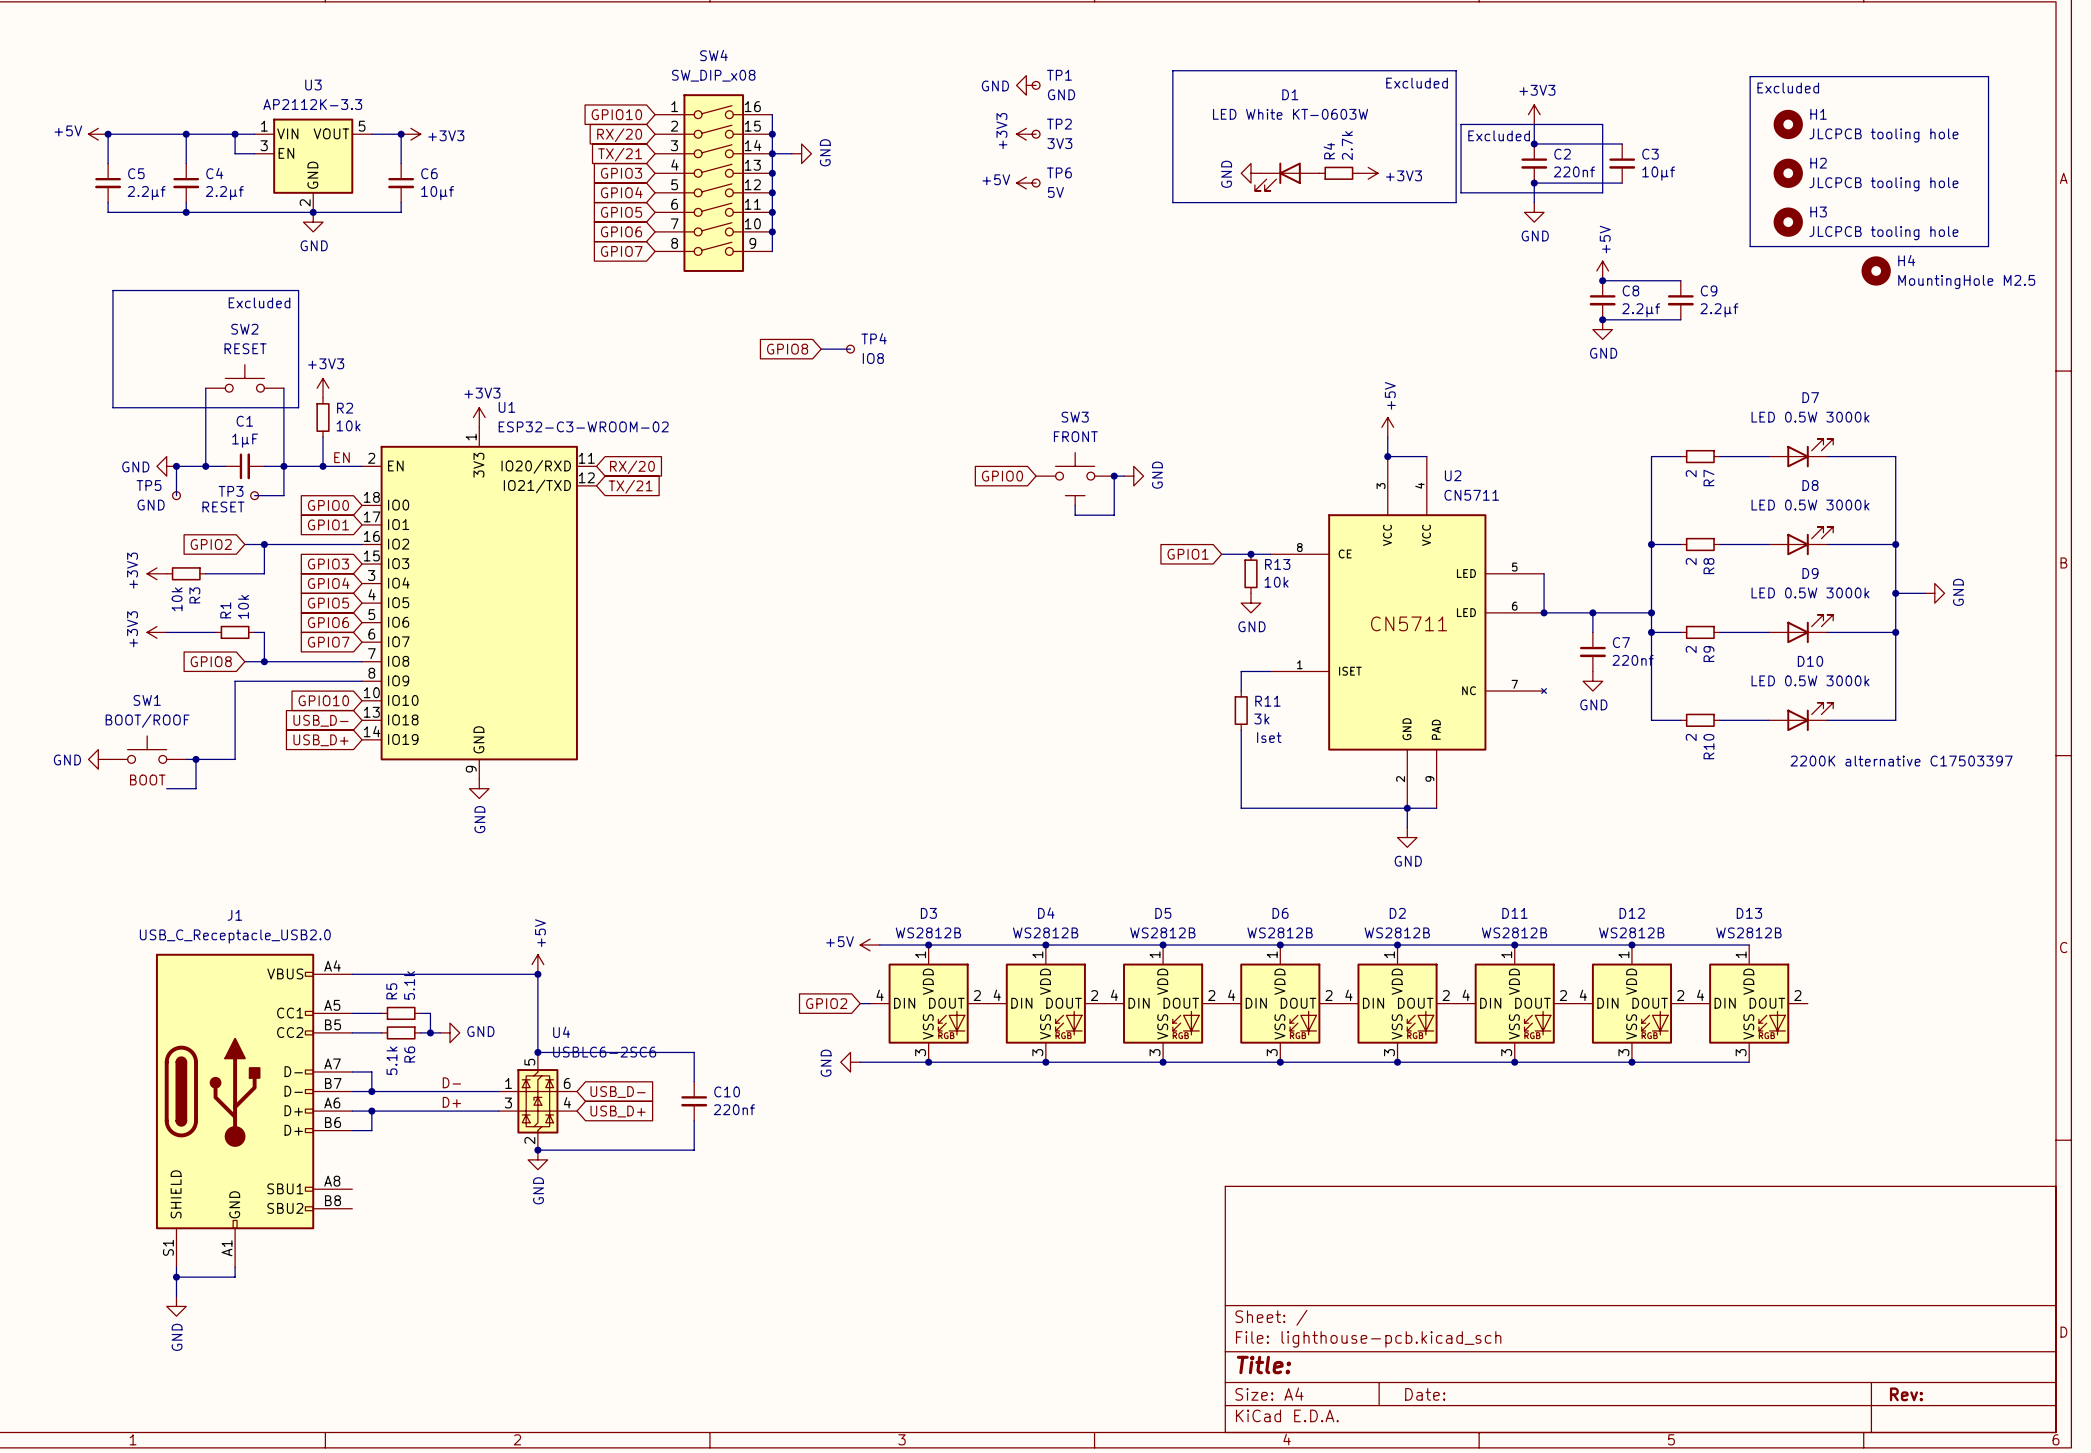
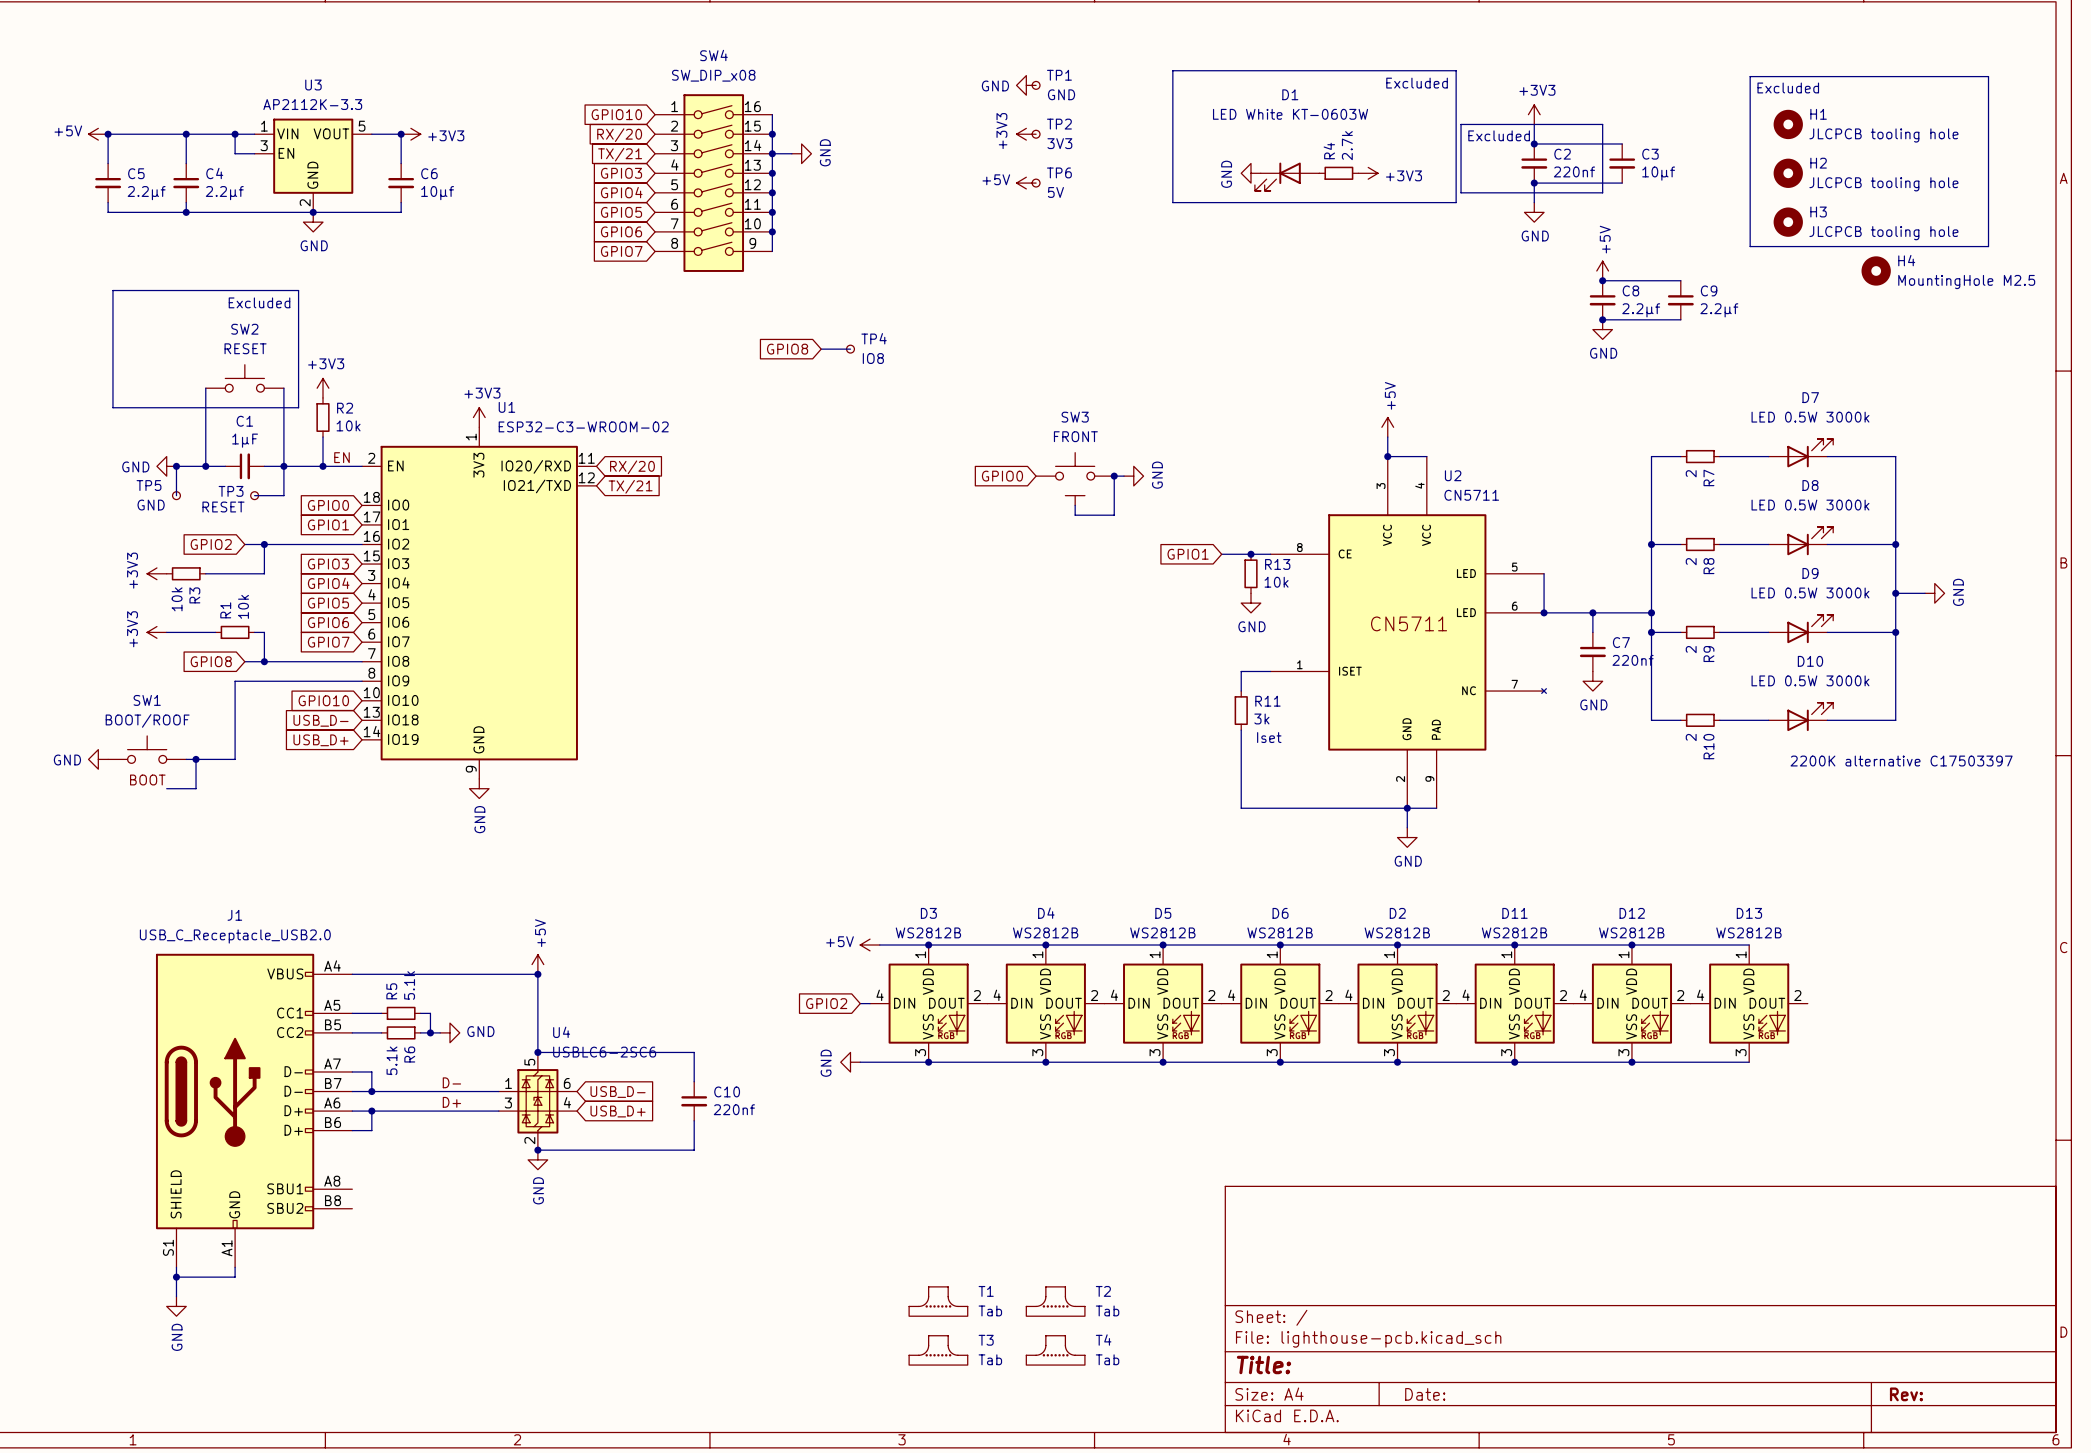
T1: none -> Tab (938, 1301)
T2: none -> Tab (1055, 1301)
T3: none -> Tab (938, 1350)
T4: none -> Tab (1055, 1350)

